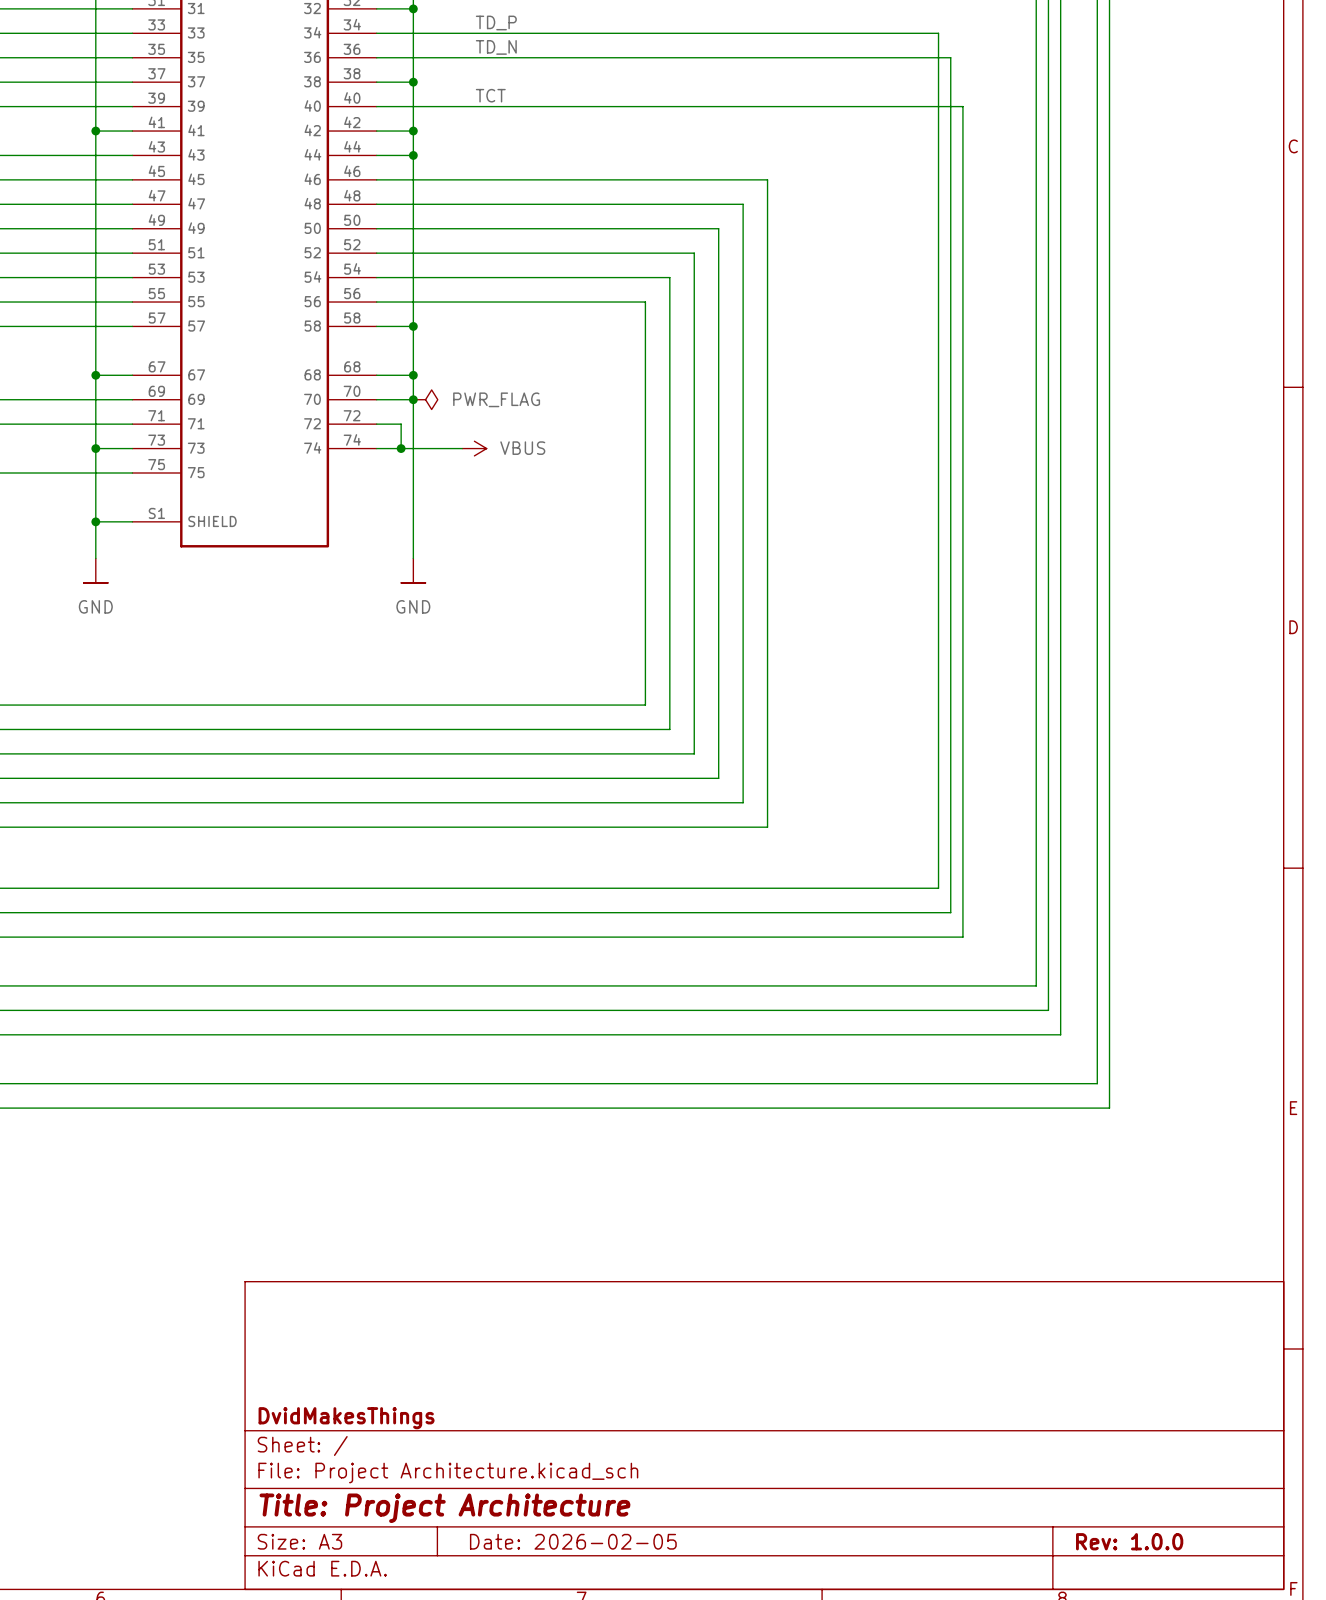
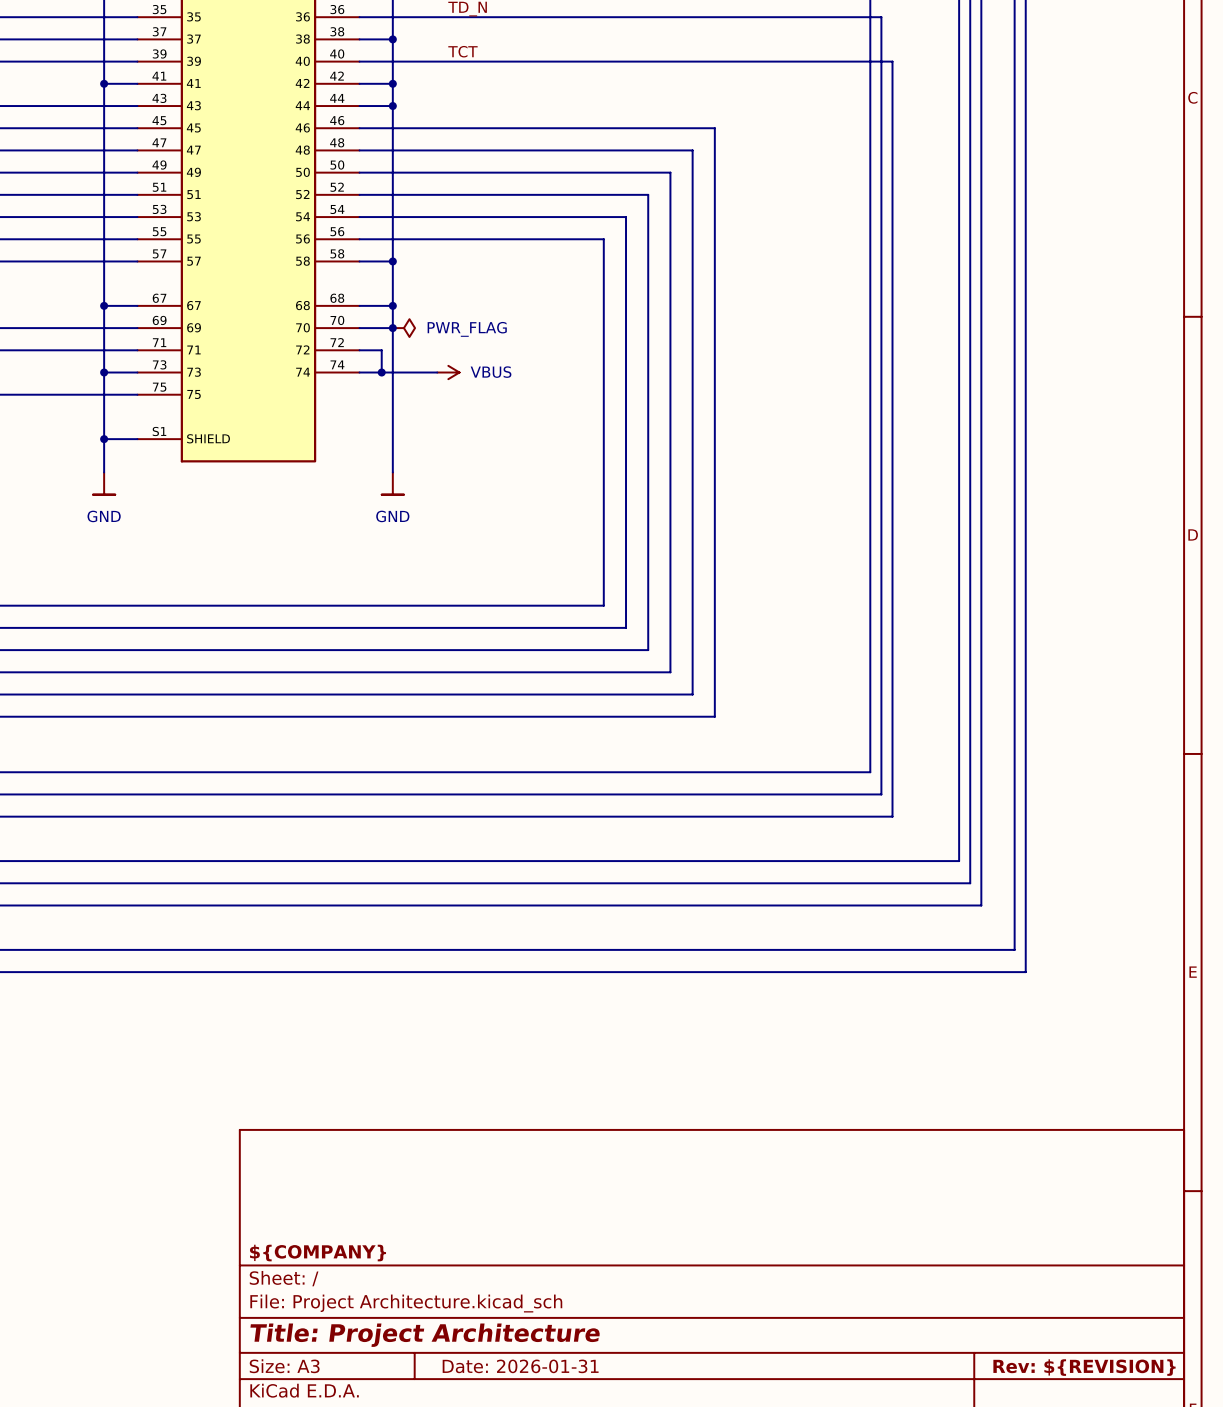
title block: DvidMakesThings (346, 1418) -> ${COMPANY} (318, 1253)
title block: Date: 2026-02-05 (573, 1541) -> Date: 2026-01-31 (520, 1366)
title block: Rev: 1.0.0 (1129, 1541) -> Rev: ${REVISION} (1084, 1367)

